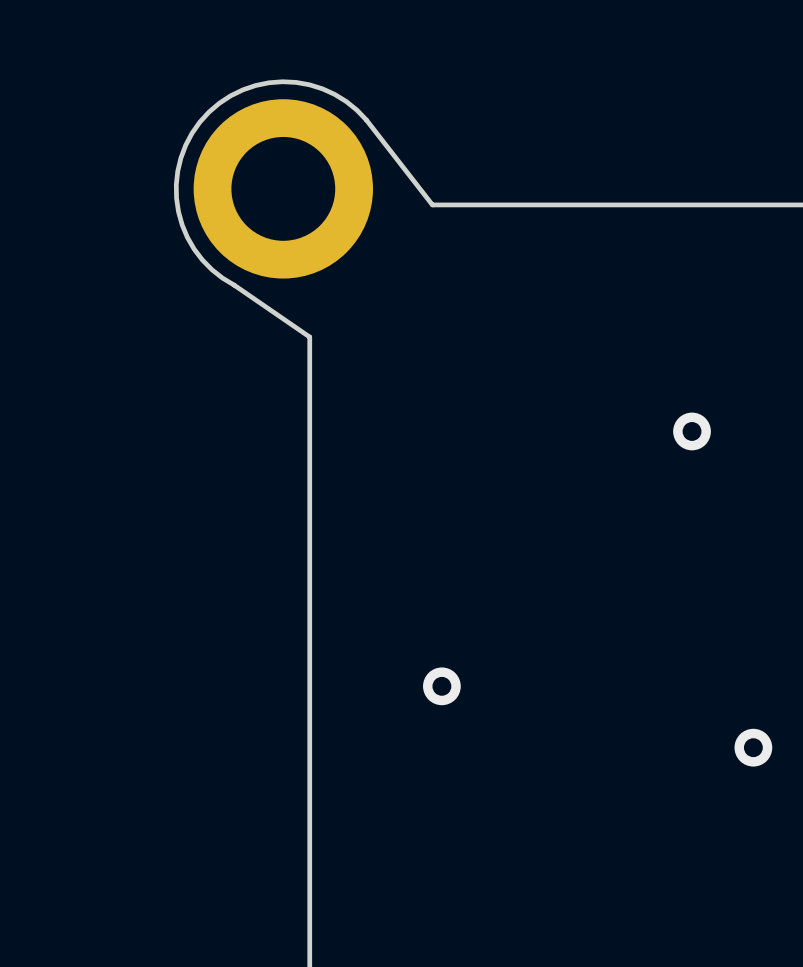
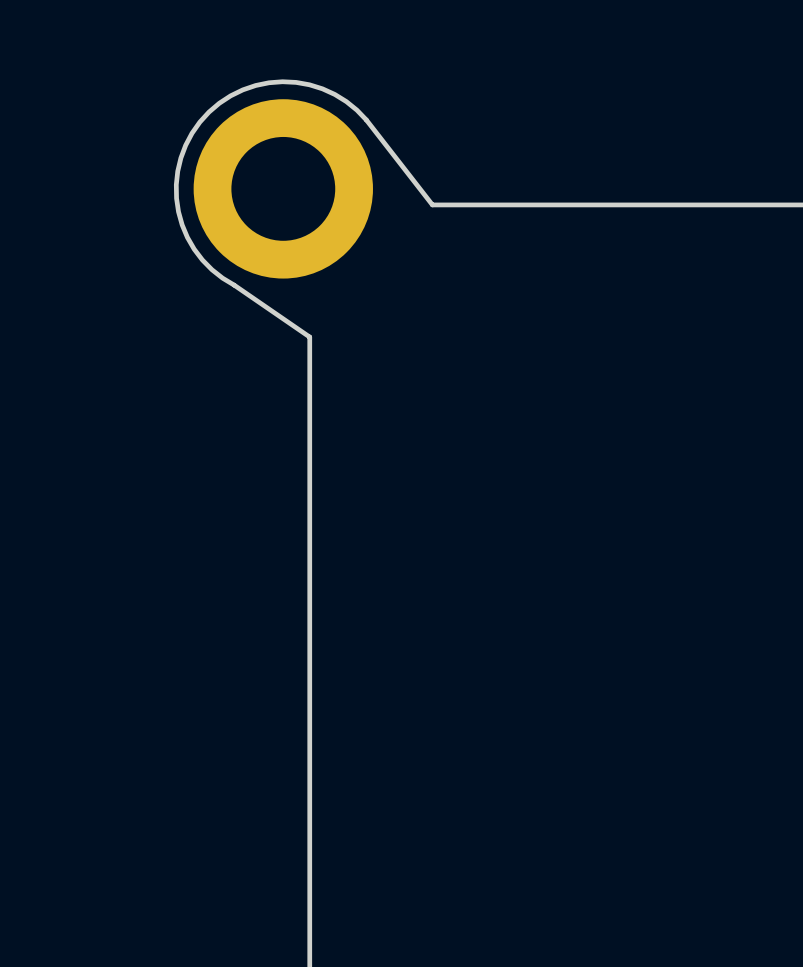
via: (692, 431) -> none
via: (441, 686) -> none
via: (753, 747) -> none

